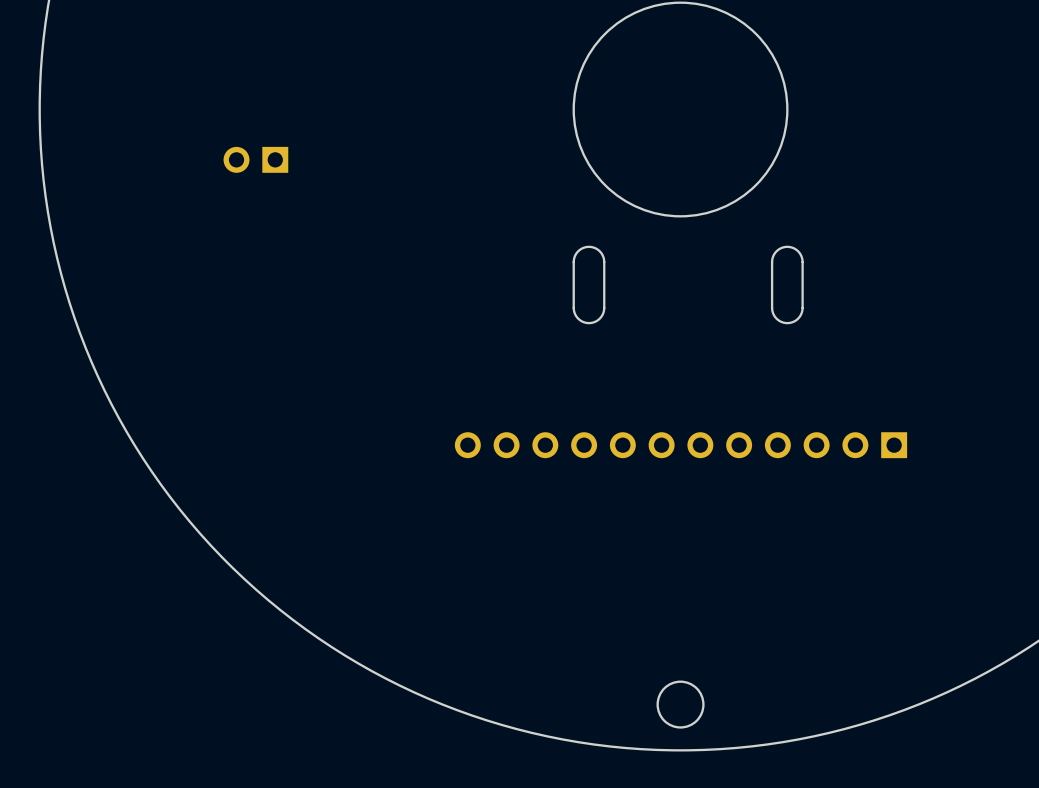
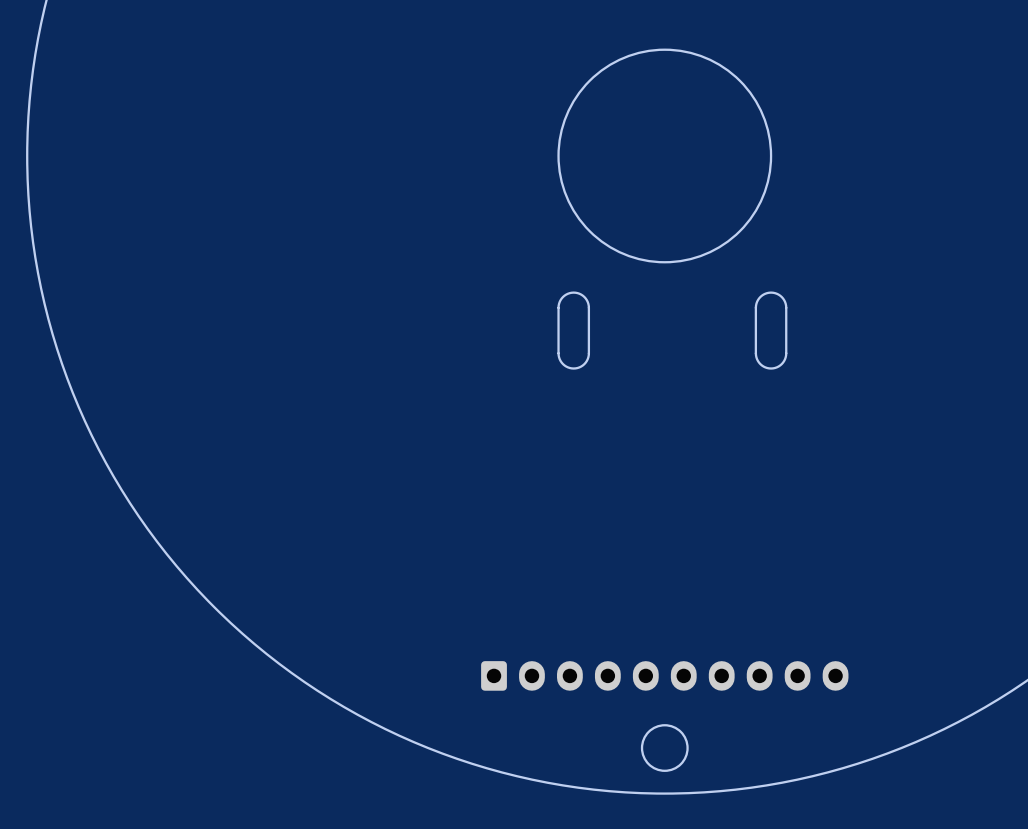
part: (255, 159) -> none
part: (681, 445) -> none
part: none -> (664, 675)

